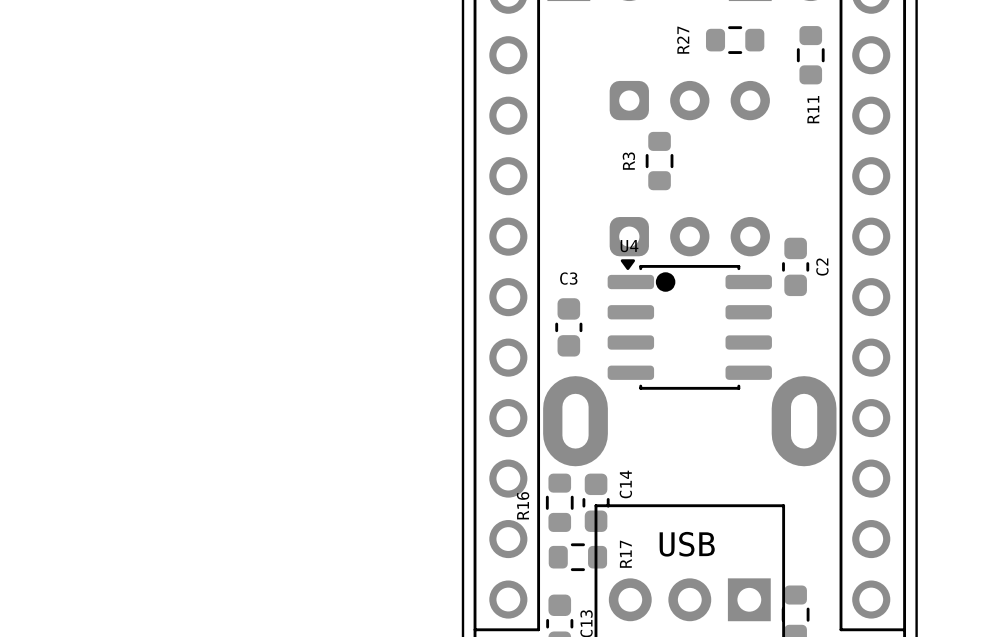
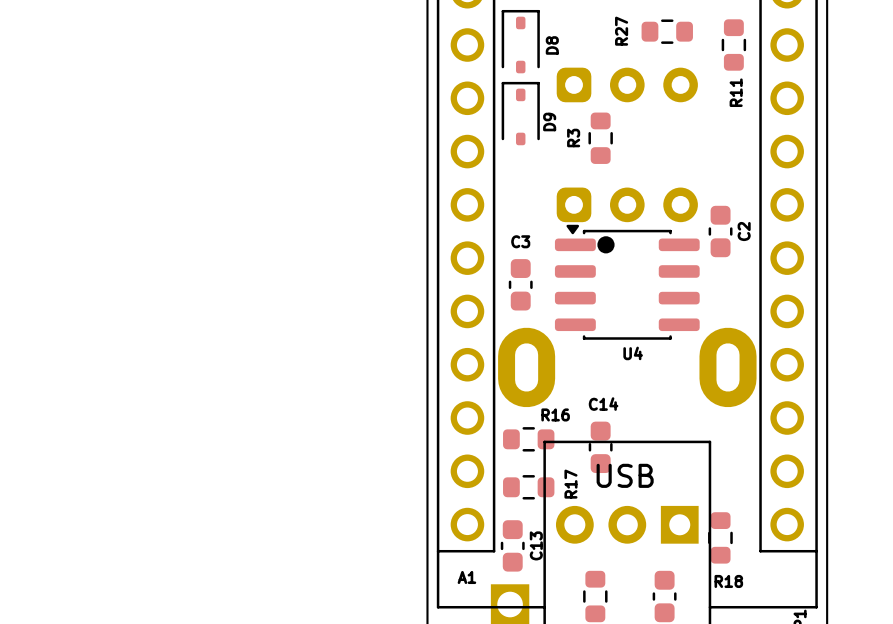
D8: none -> (520, 41)
D9: none -> (520, 113)
U4 name position: U4 (629, 246) -> U4 (633, 353)
C14 name rotation: 0° (625, 484) -> 90° clockwise (603, 404)
R16 rotation: 0° (559, 502) -> 90° clockwise (528, 439)
C14 position: (596, 502) -> (600, 447)

